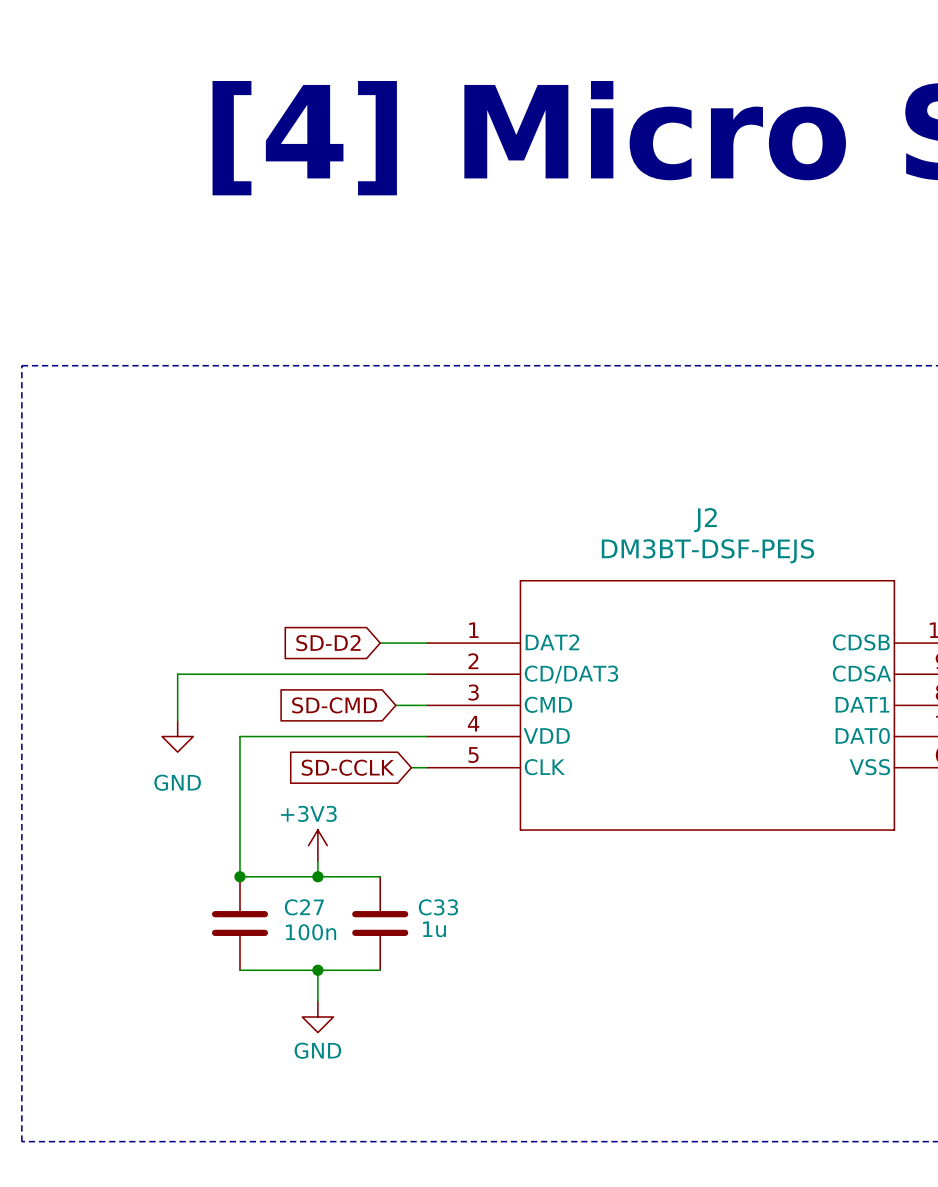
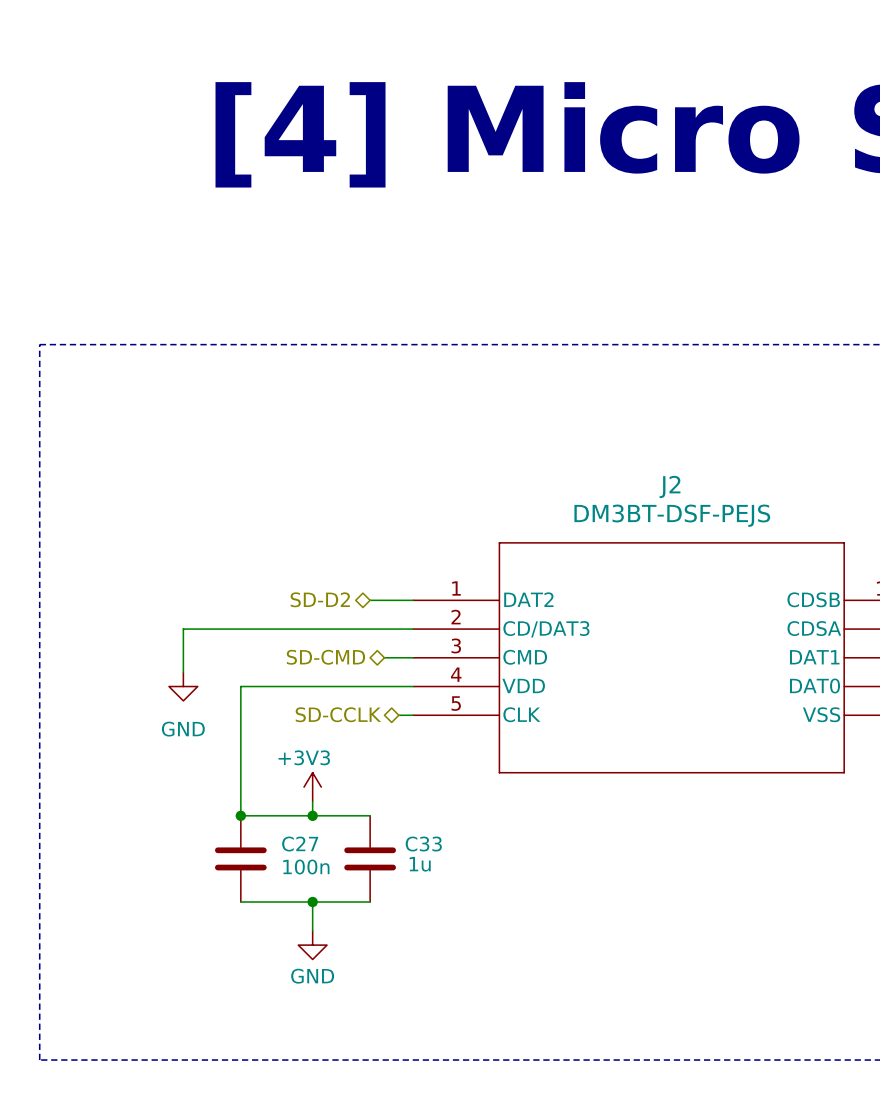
hierarchical label: none -> SD-D2 (320, 599)
global label: SD-D2 (328, 643) -> none
hierarchical label: none -> SD-CMD (325, 657)
global label: SD-CMD (334, 705) -> none
hierarchical label: none -> SD-CCLK (338, 714)
global label: SD-CCLK (348, 767) -> none

